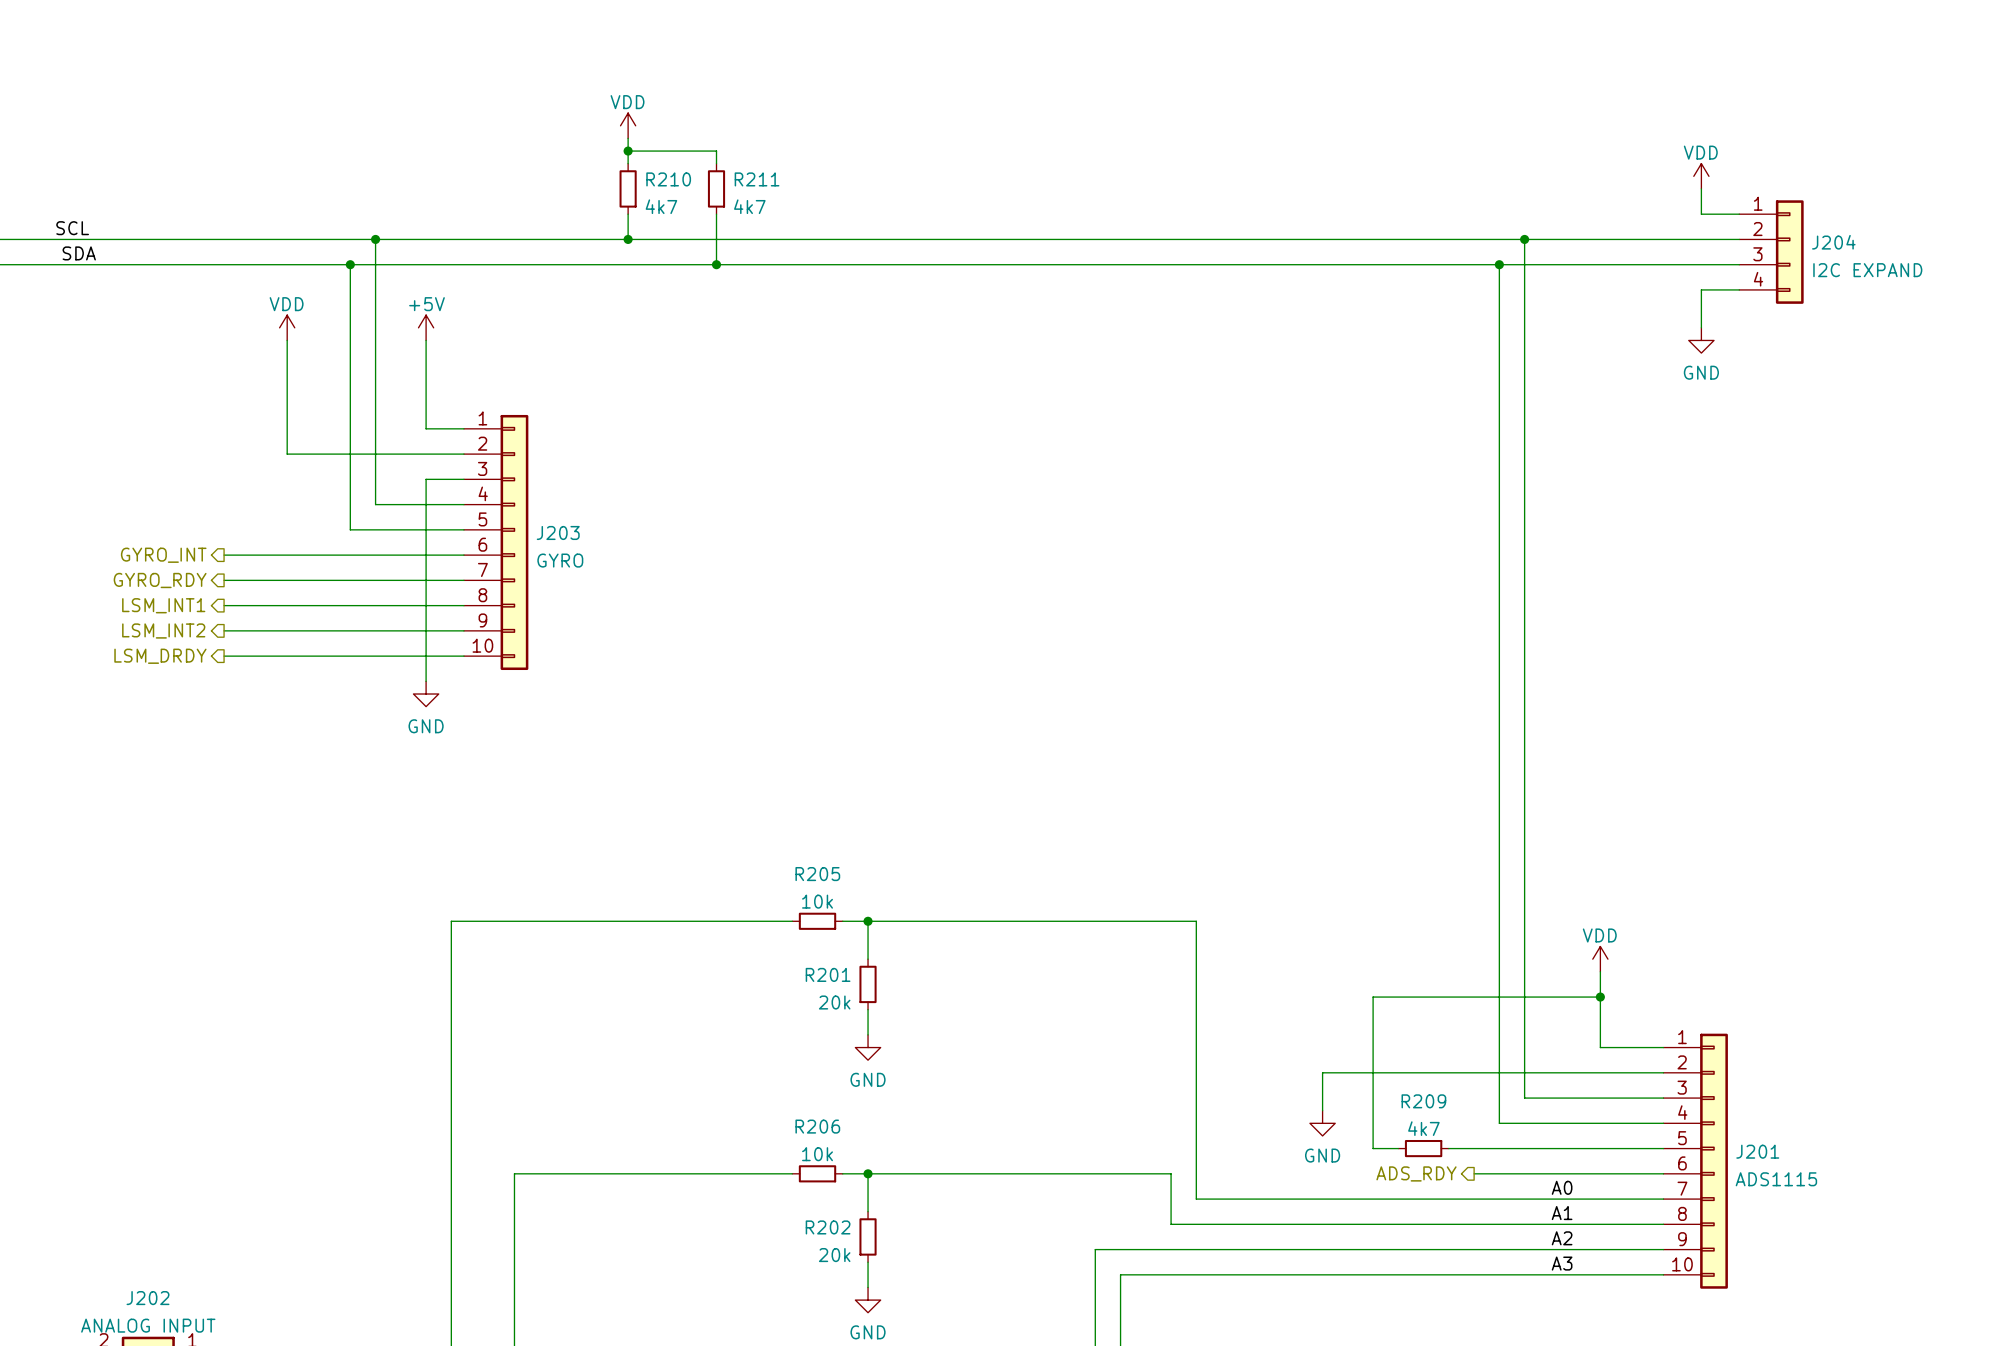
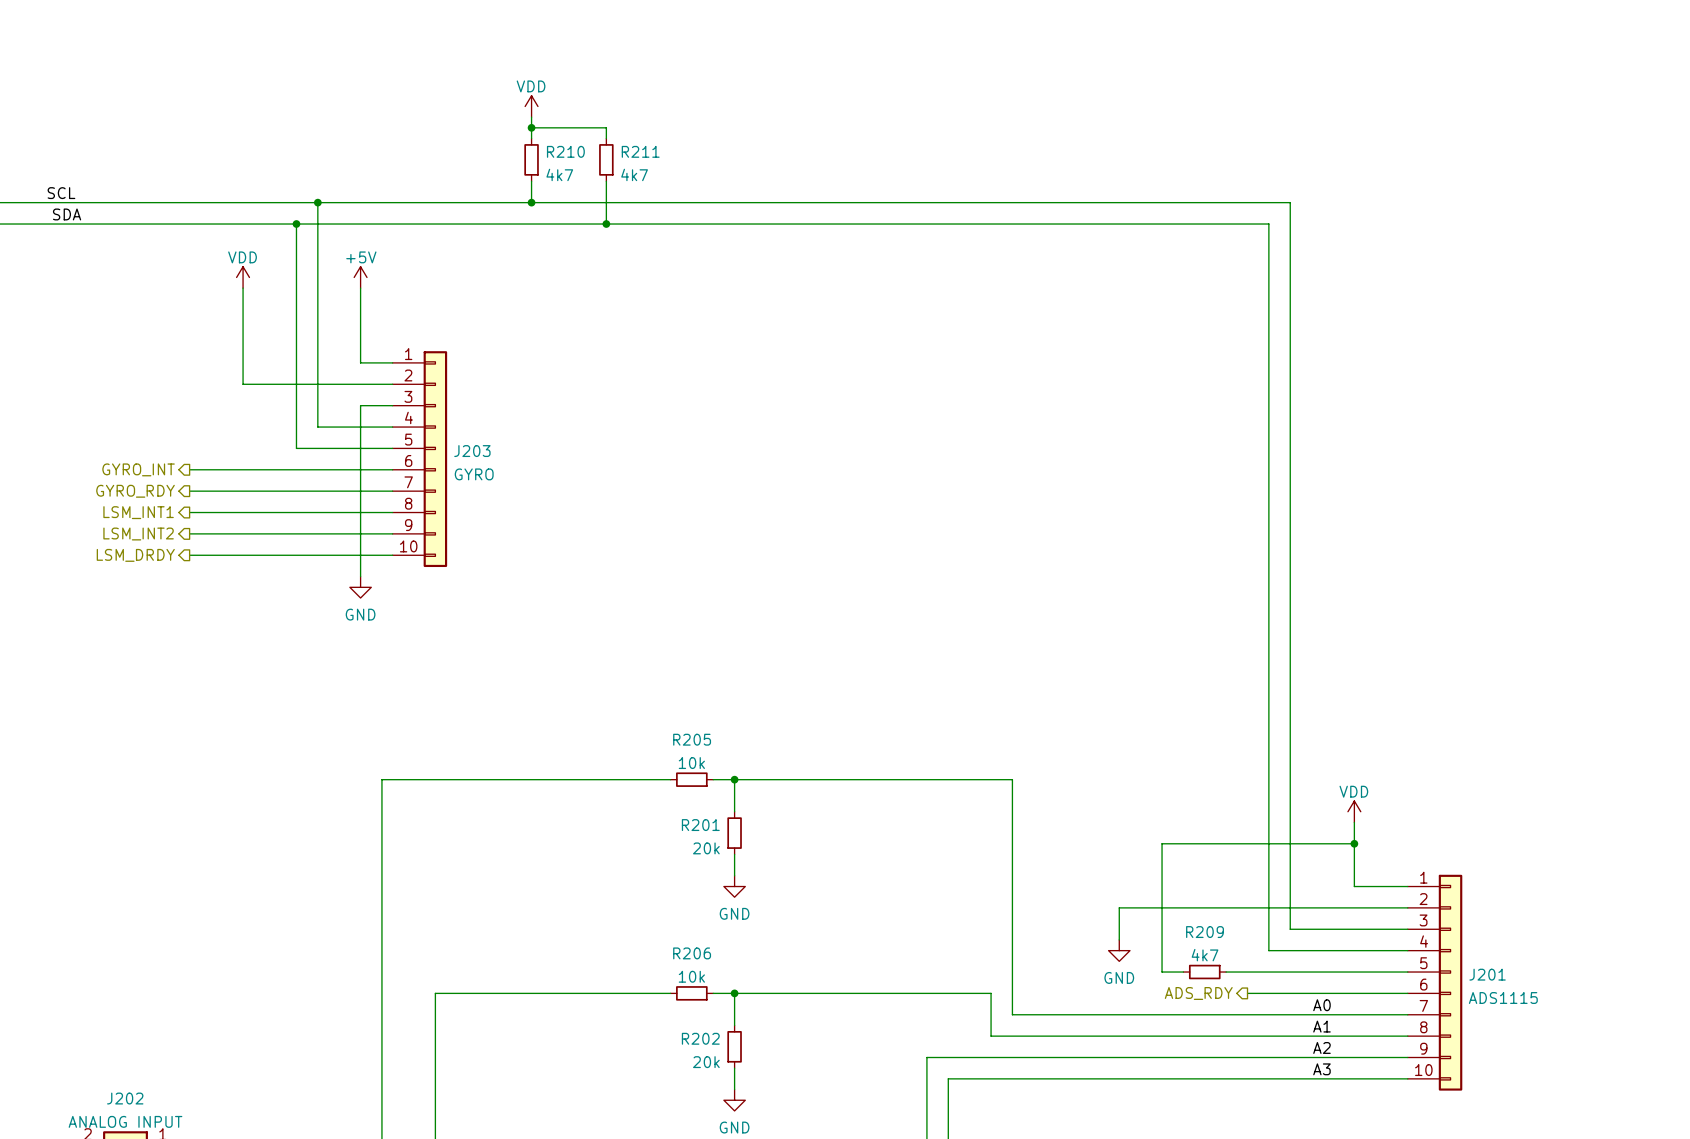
power symbol: VDD (1701, 176) -> none
wire: (1701, 188) (1701, 214) (1739, 214) -> none
wire: (1524, 239) (1739, 239) -> none
junction: (1524, 239) -> none
J204: I2C EXPAND (1771, 252) -> none
wire: (1499, 264) (1739, 264) -> none
junction: (1499, 264) -> none
wire: (1739, 289) (1701, 289) (1701, 327) -> none
power symbol: GND (1701, 340) -> none

